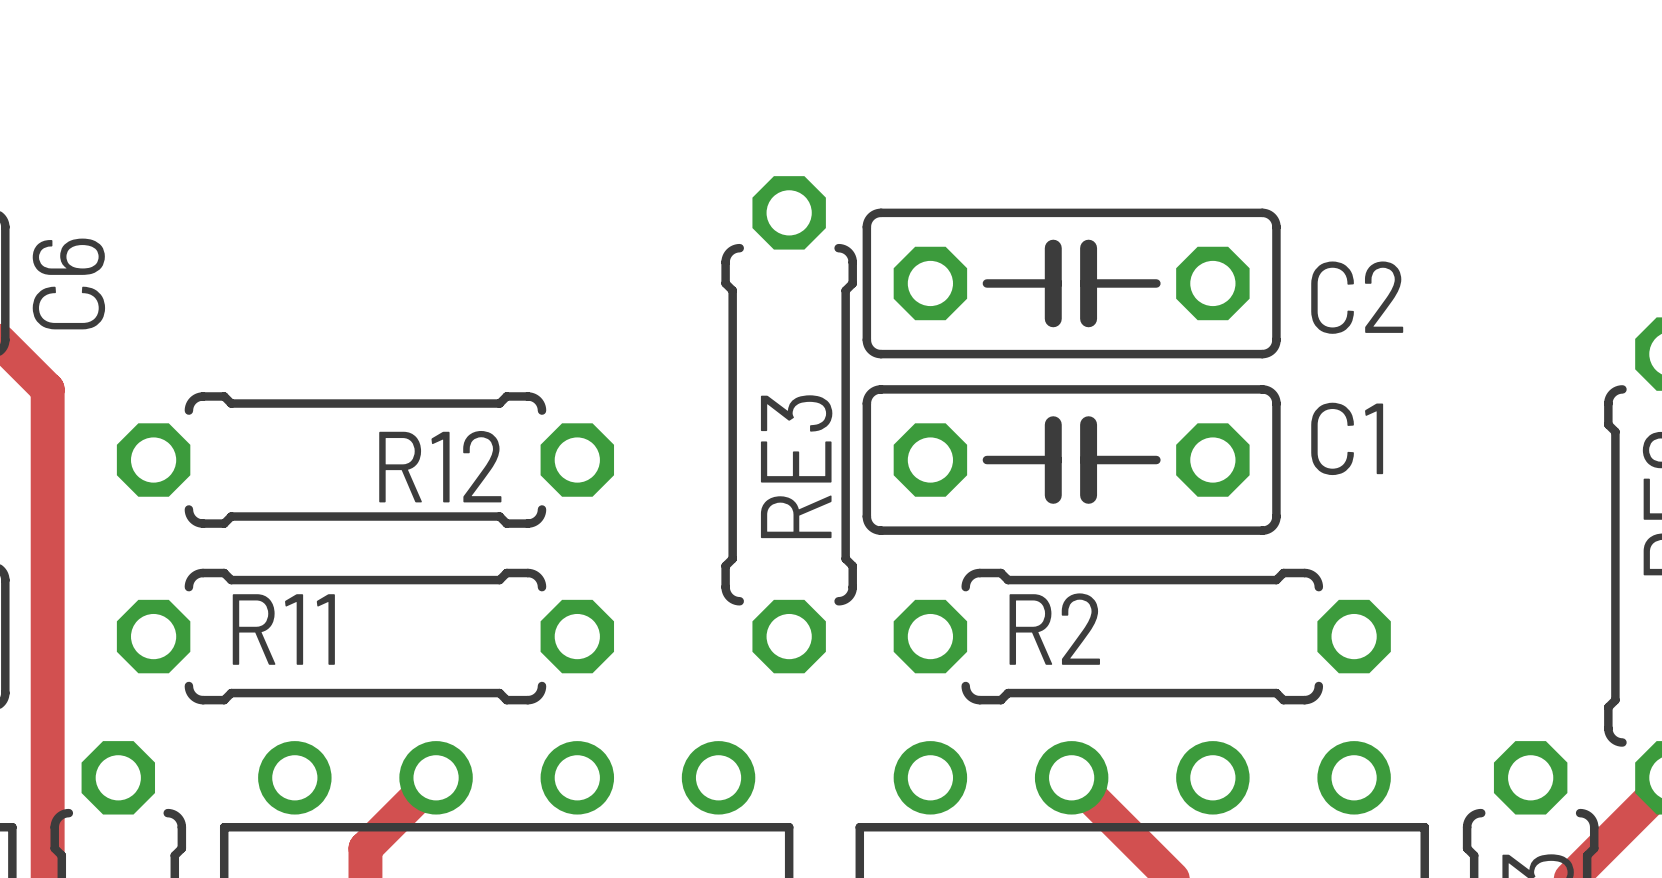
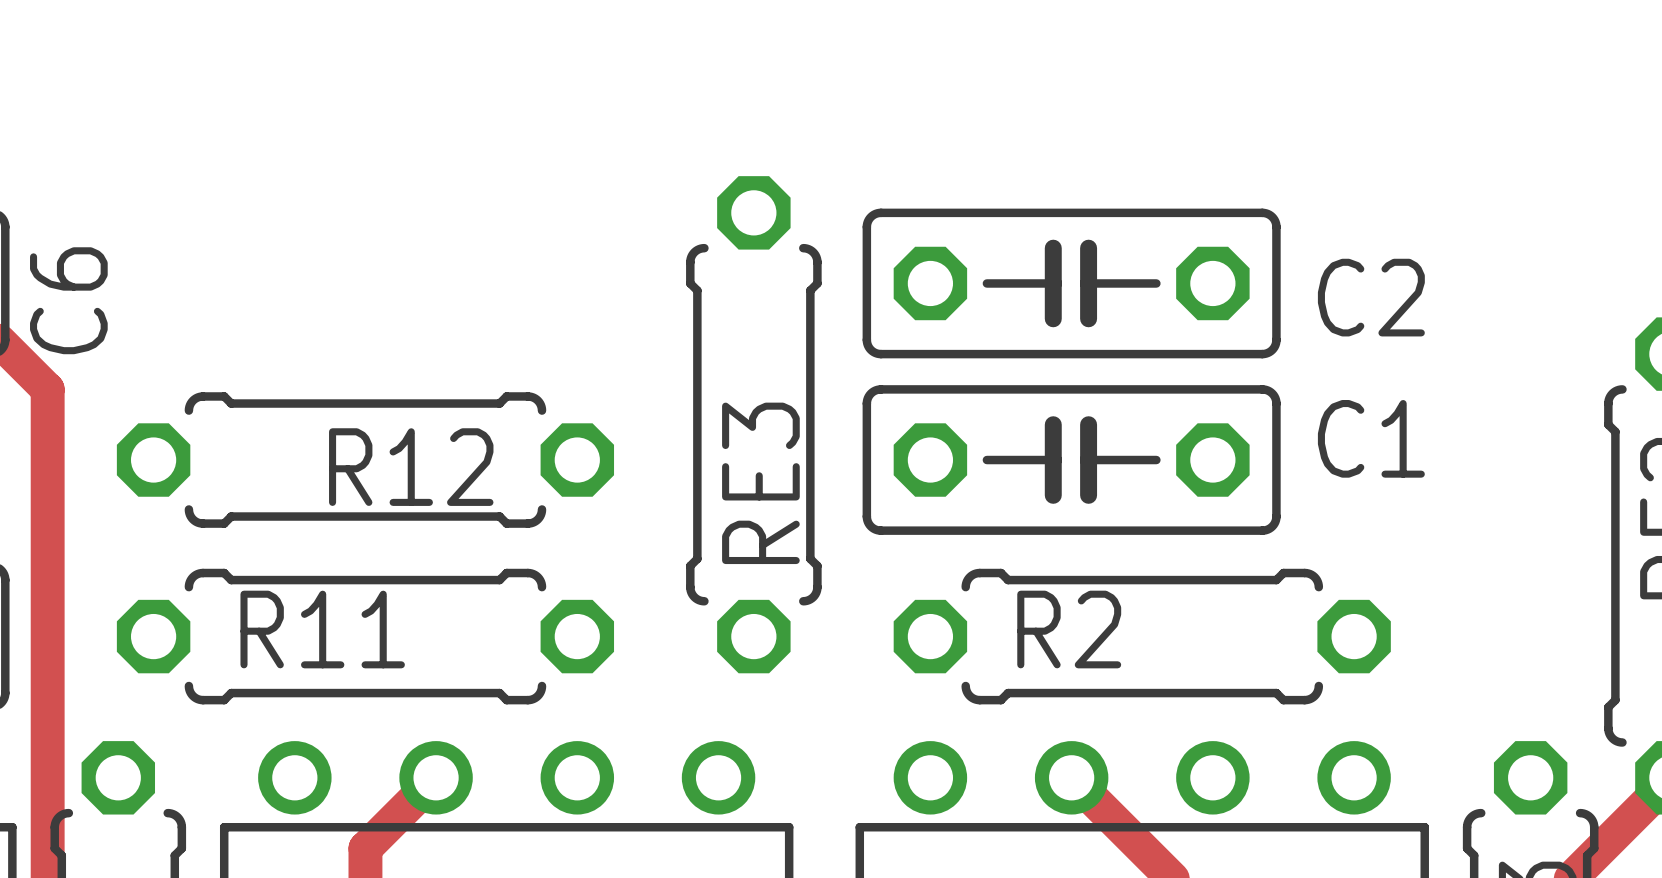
RE3 position: (789, 424) -> (753, 424)

